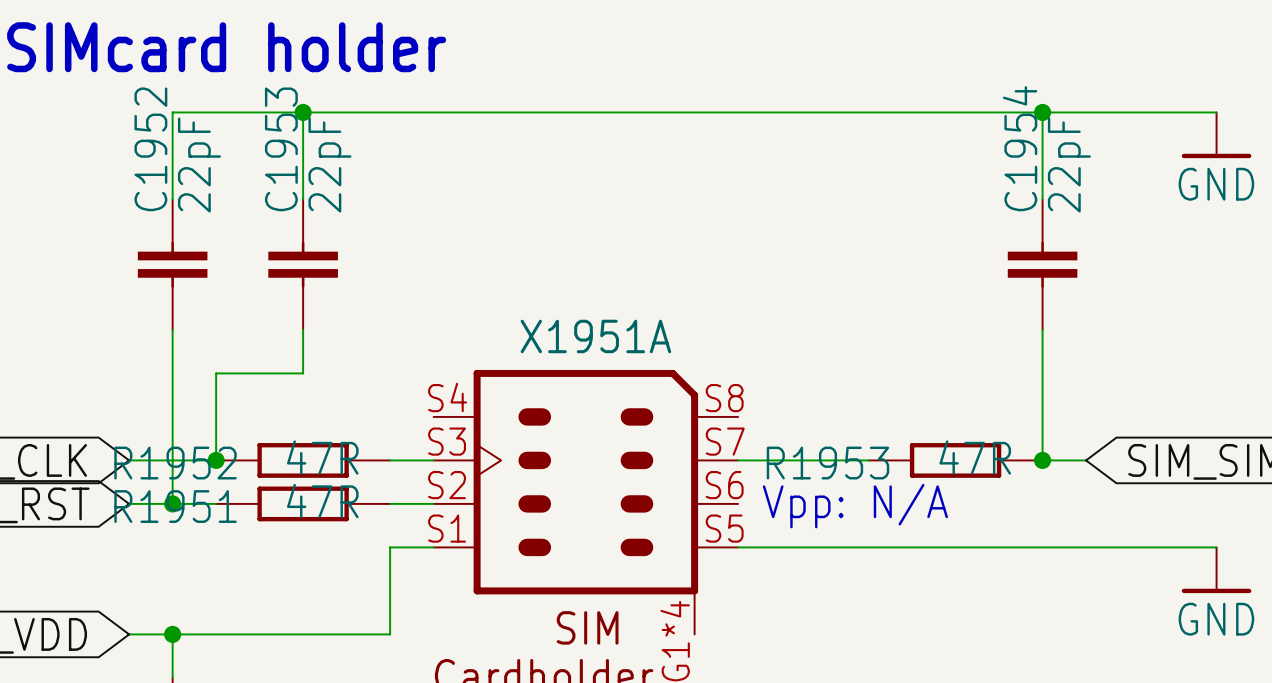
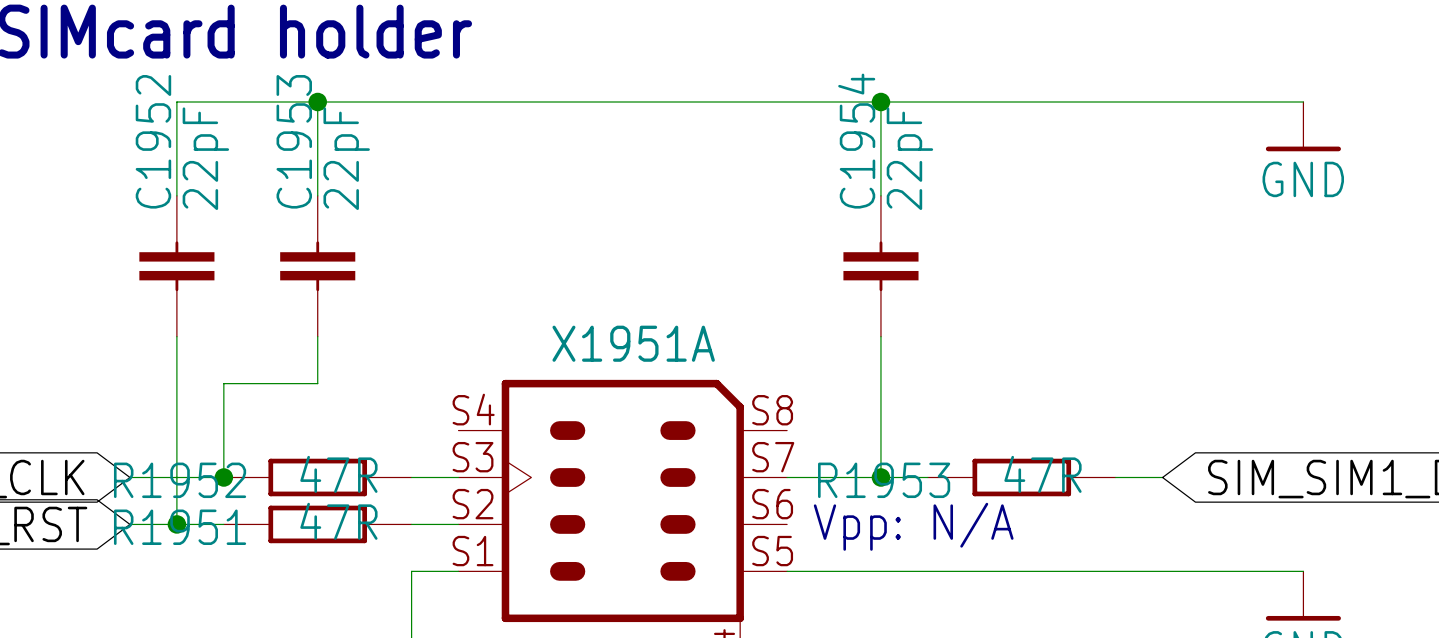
junction: none -> (880, 102)
wire: (1042, 112) (1042, 199) -> (880, 102) (880, 195)
junction: (1042, 112) -> none
C1954 position: (1042, 264) -> (880, 266)
wire: (1042, 329) (1042, 460) -> (880, 336) (880, 477)
junction: none -> (880, 477)
junction: (1042, 460) -> none

